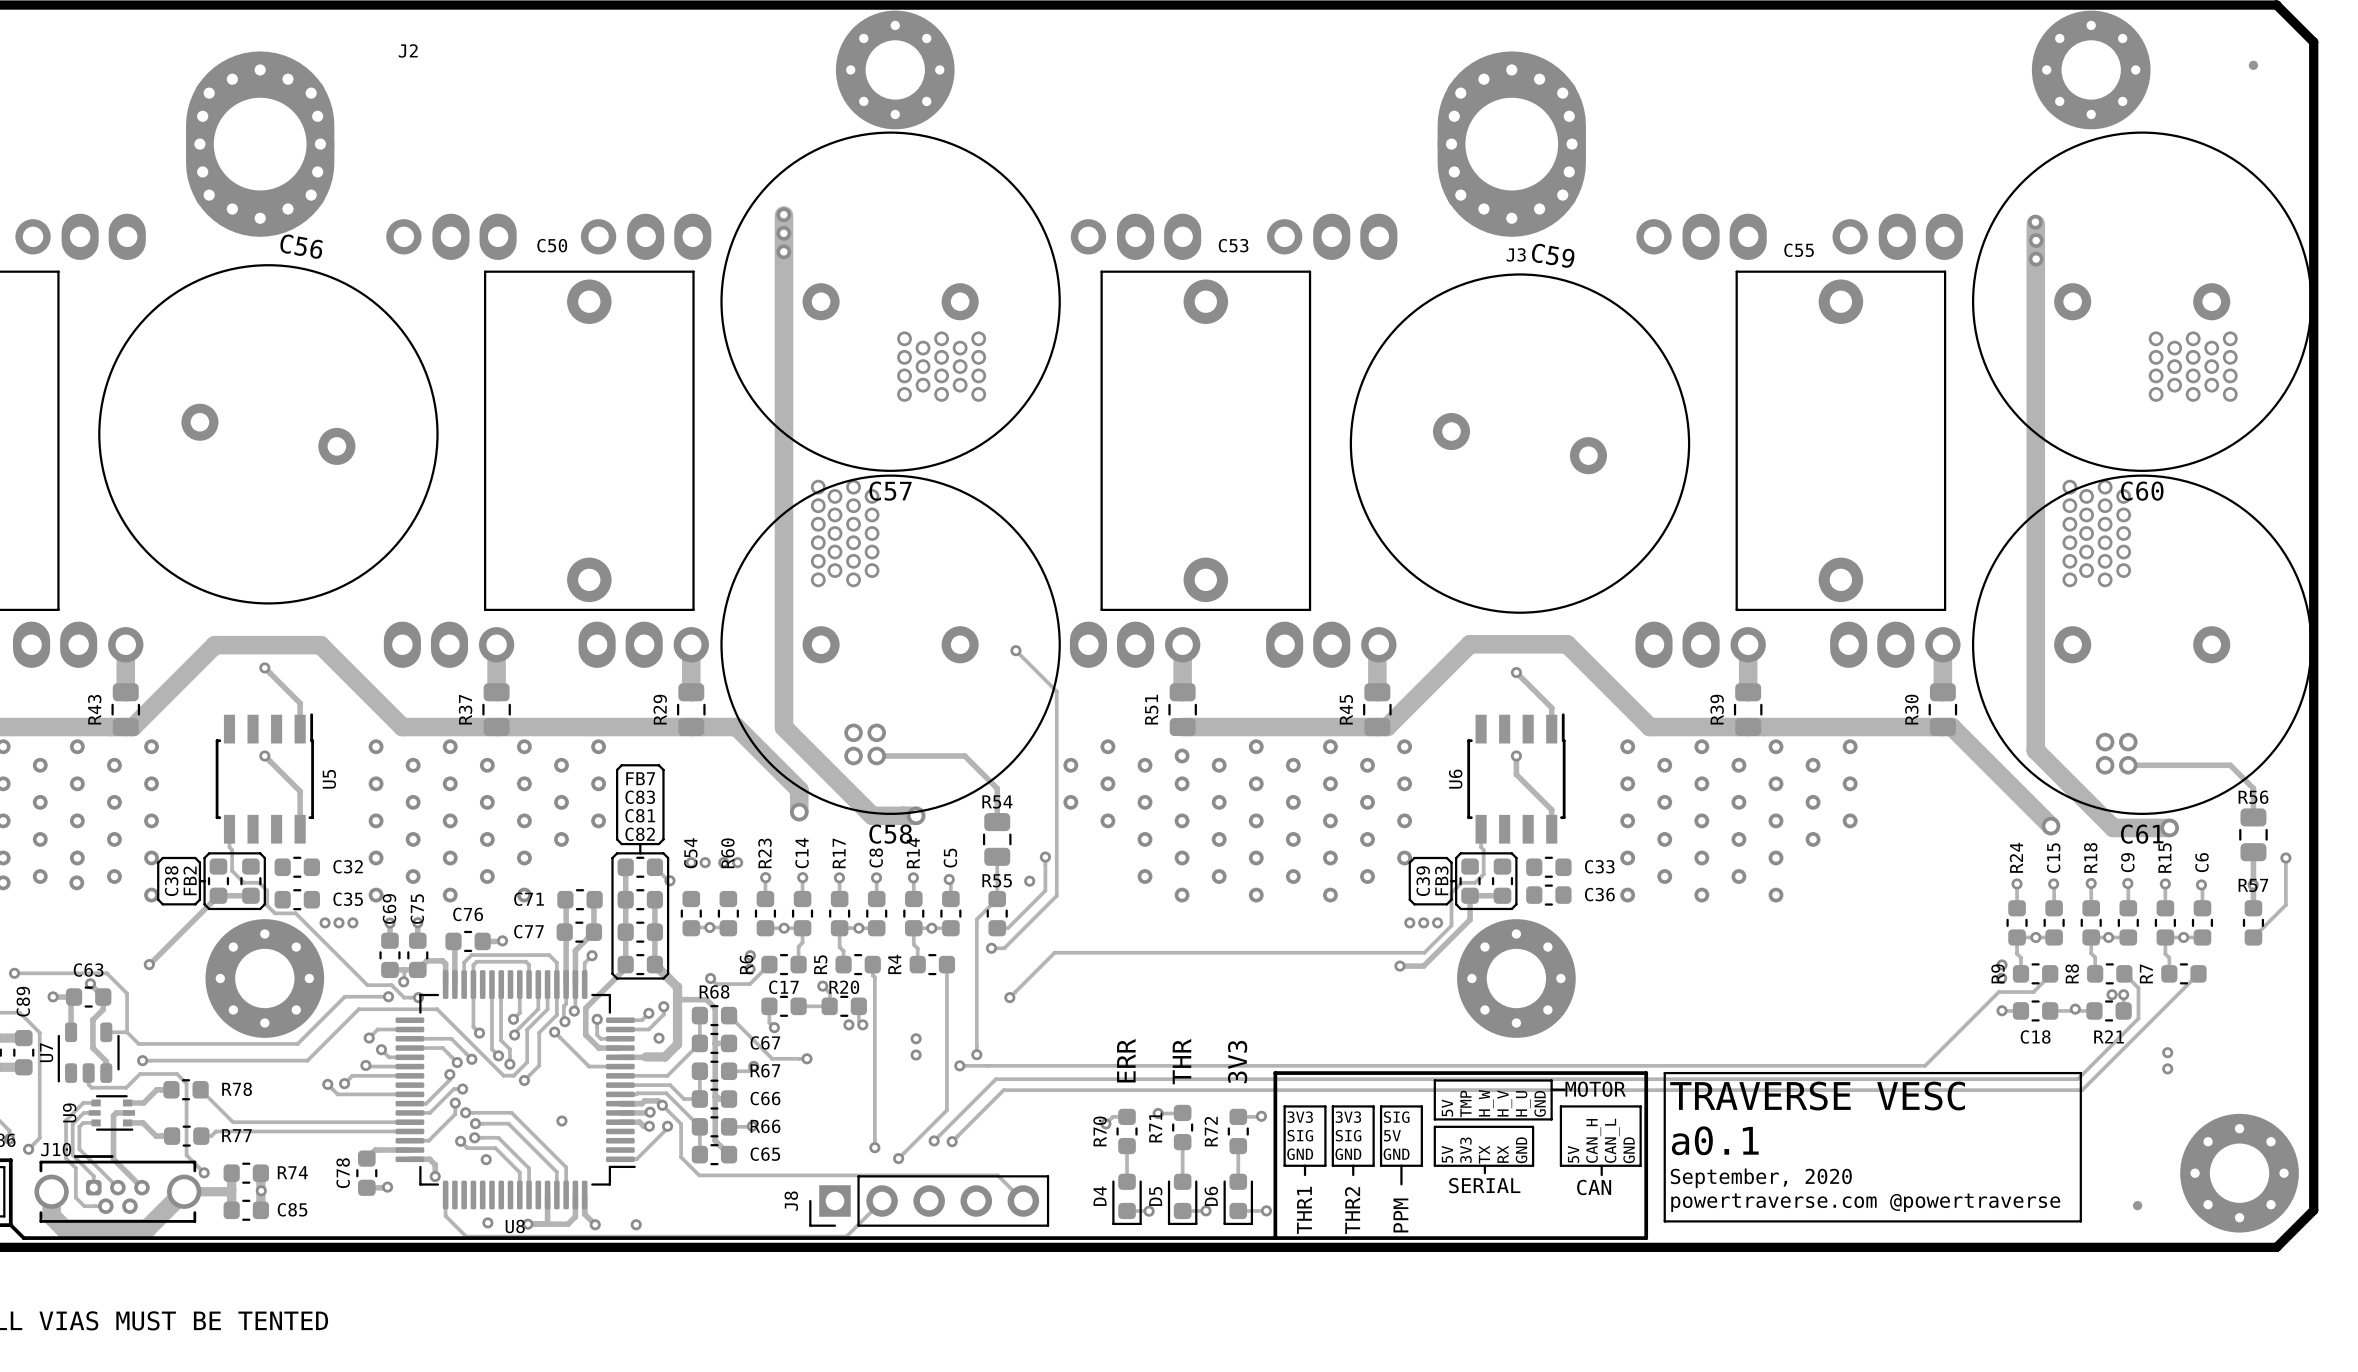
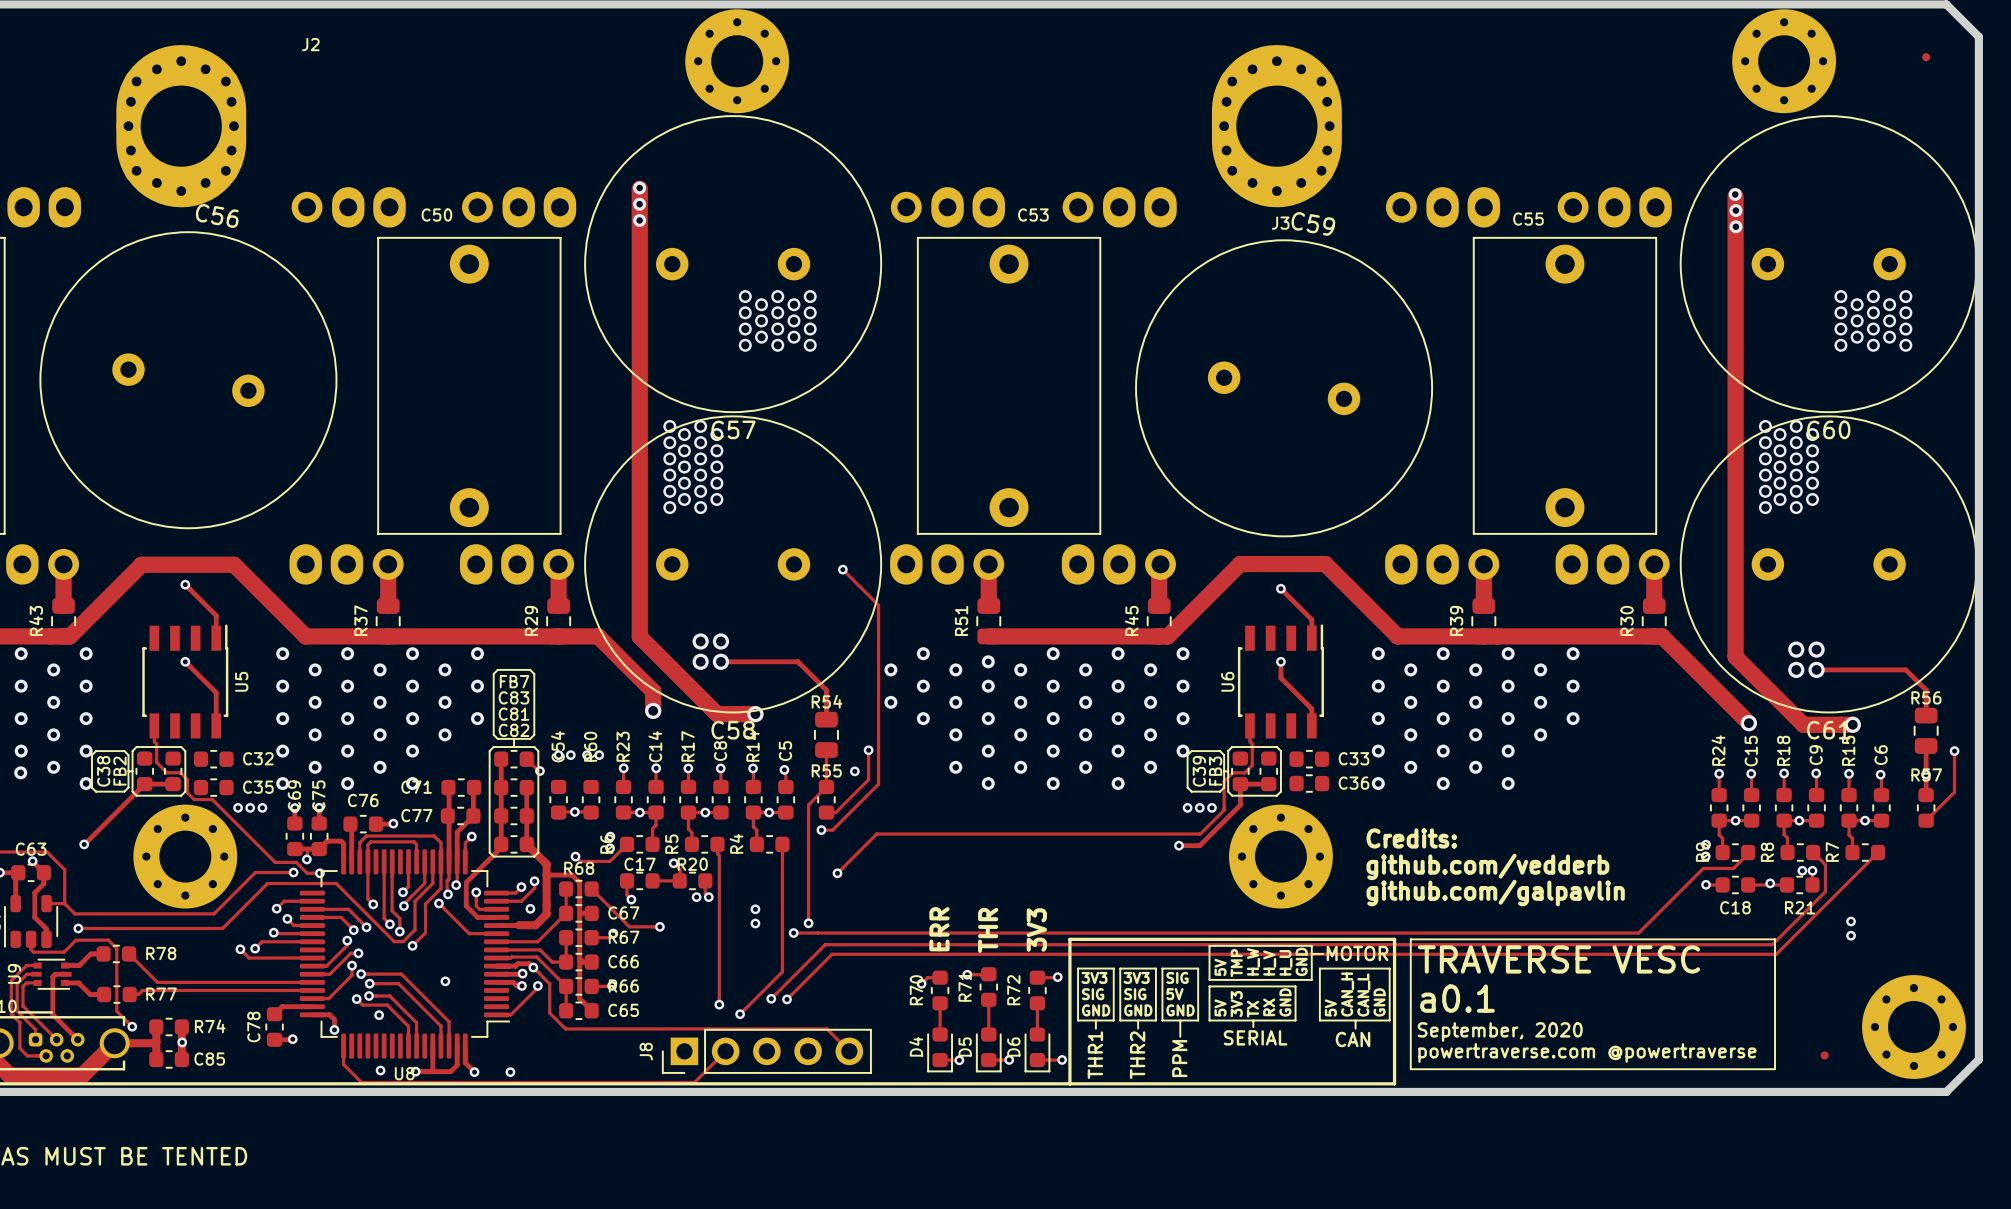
text: none -> Credits: (1411, 838)
text: none -> github.com/vedderb (1487, 866)
text: none -> github.com/galpavlin (1495, 893)

